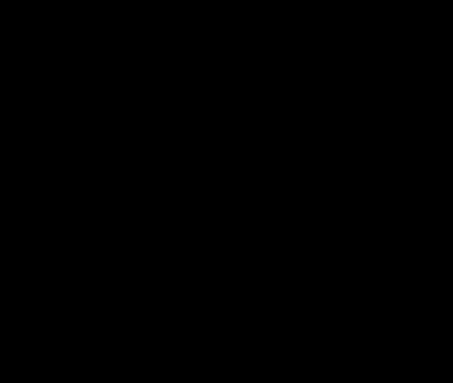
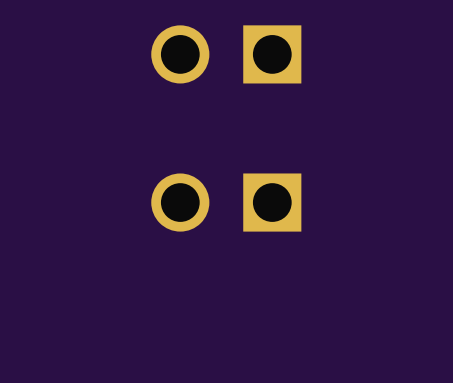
part: none -> (226, 54)
part: none -> (226, 202)

